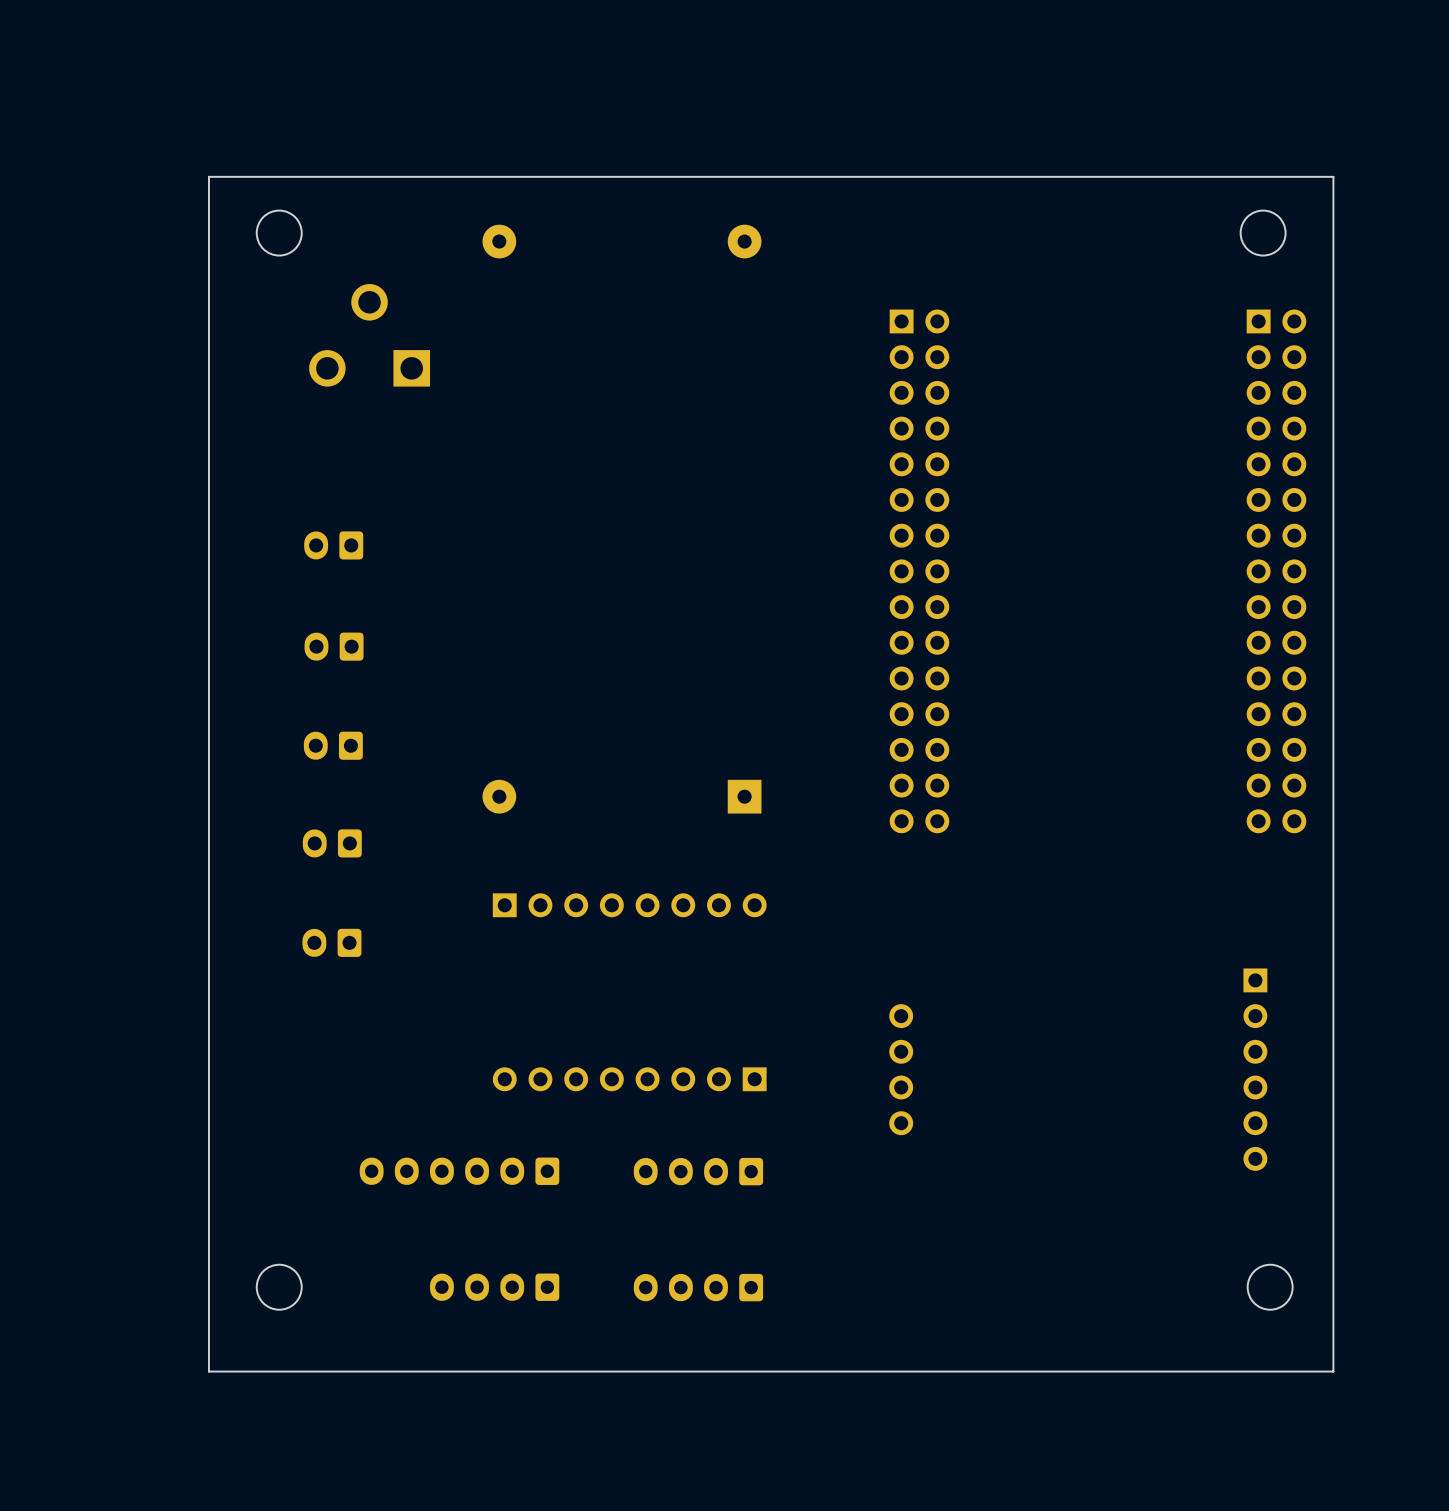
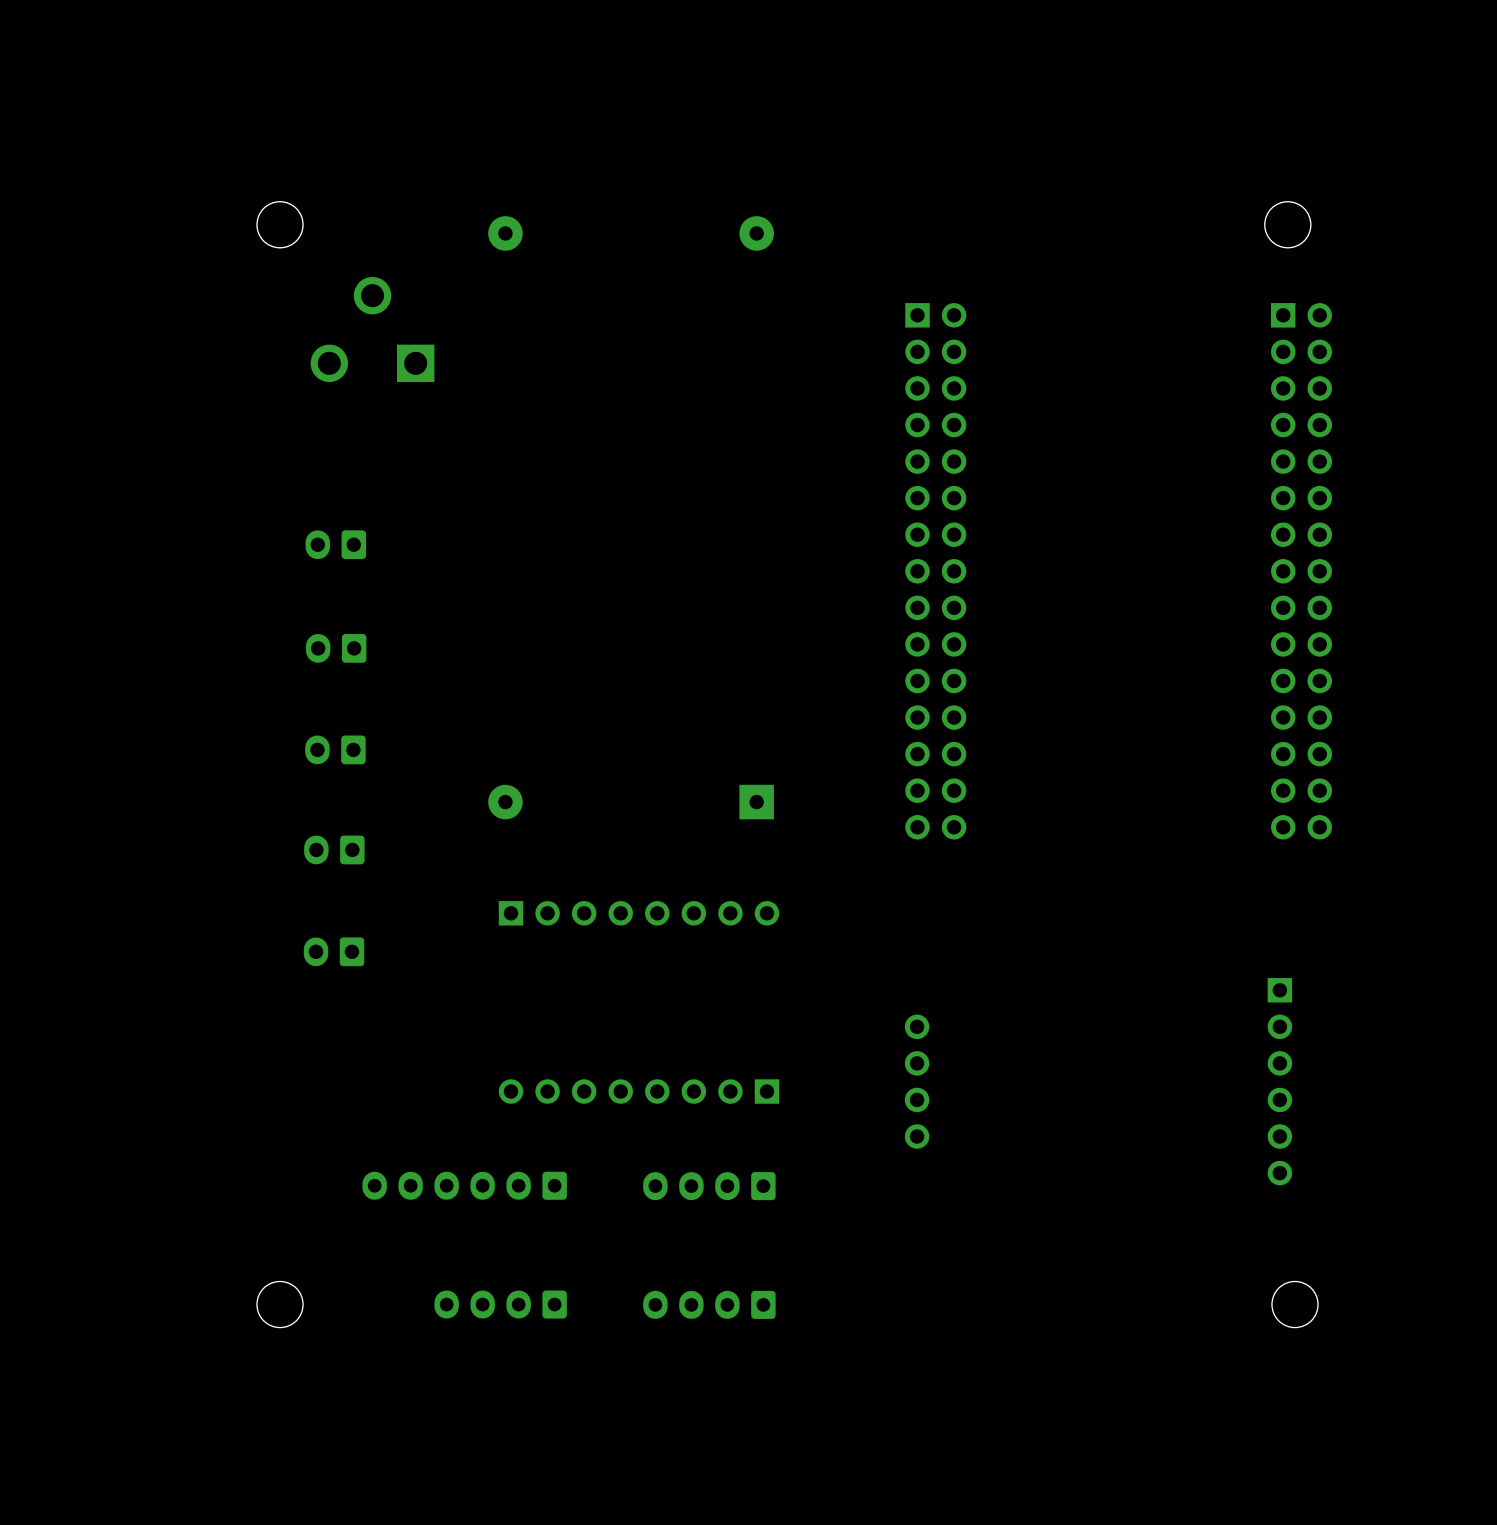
board edge: (1333, 176) (208, 176) (208, 1371) (1333, 1371) (1333, 176) -> none

